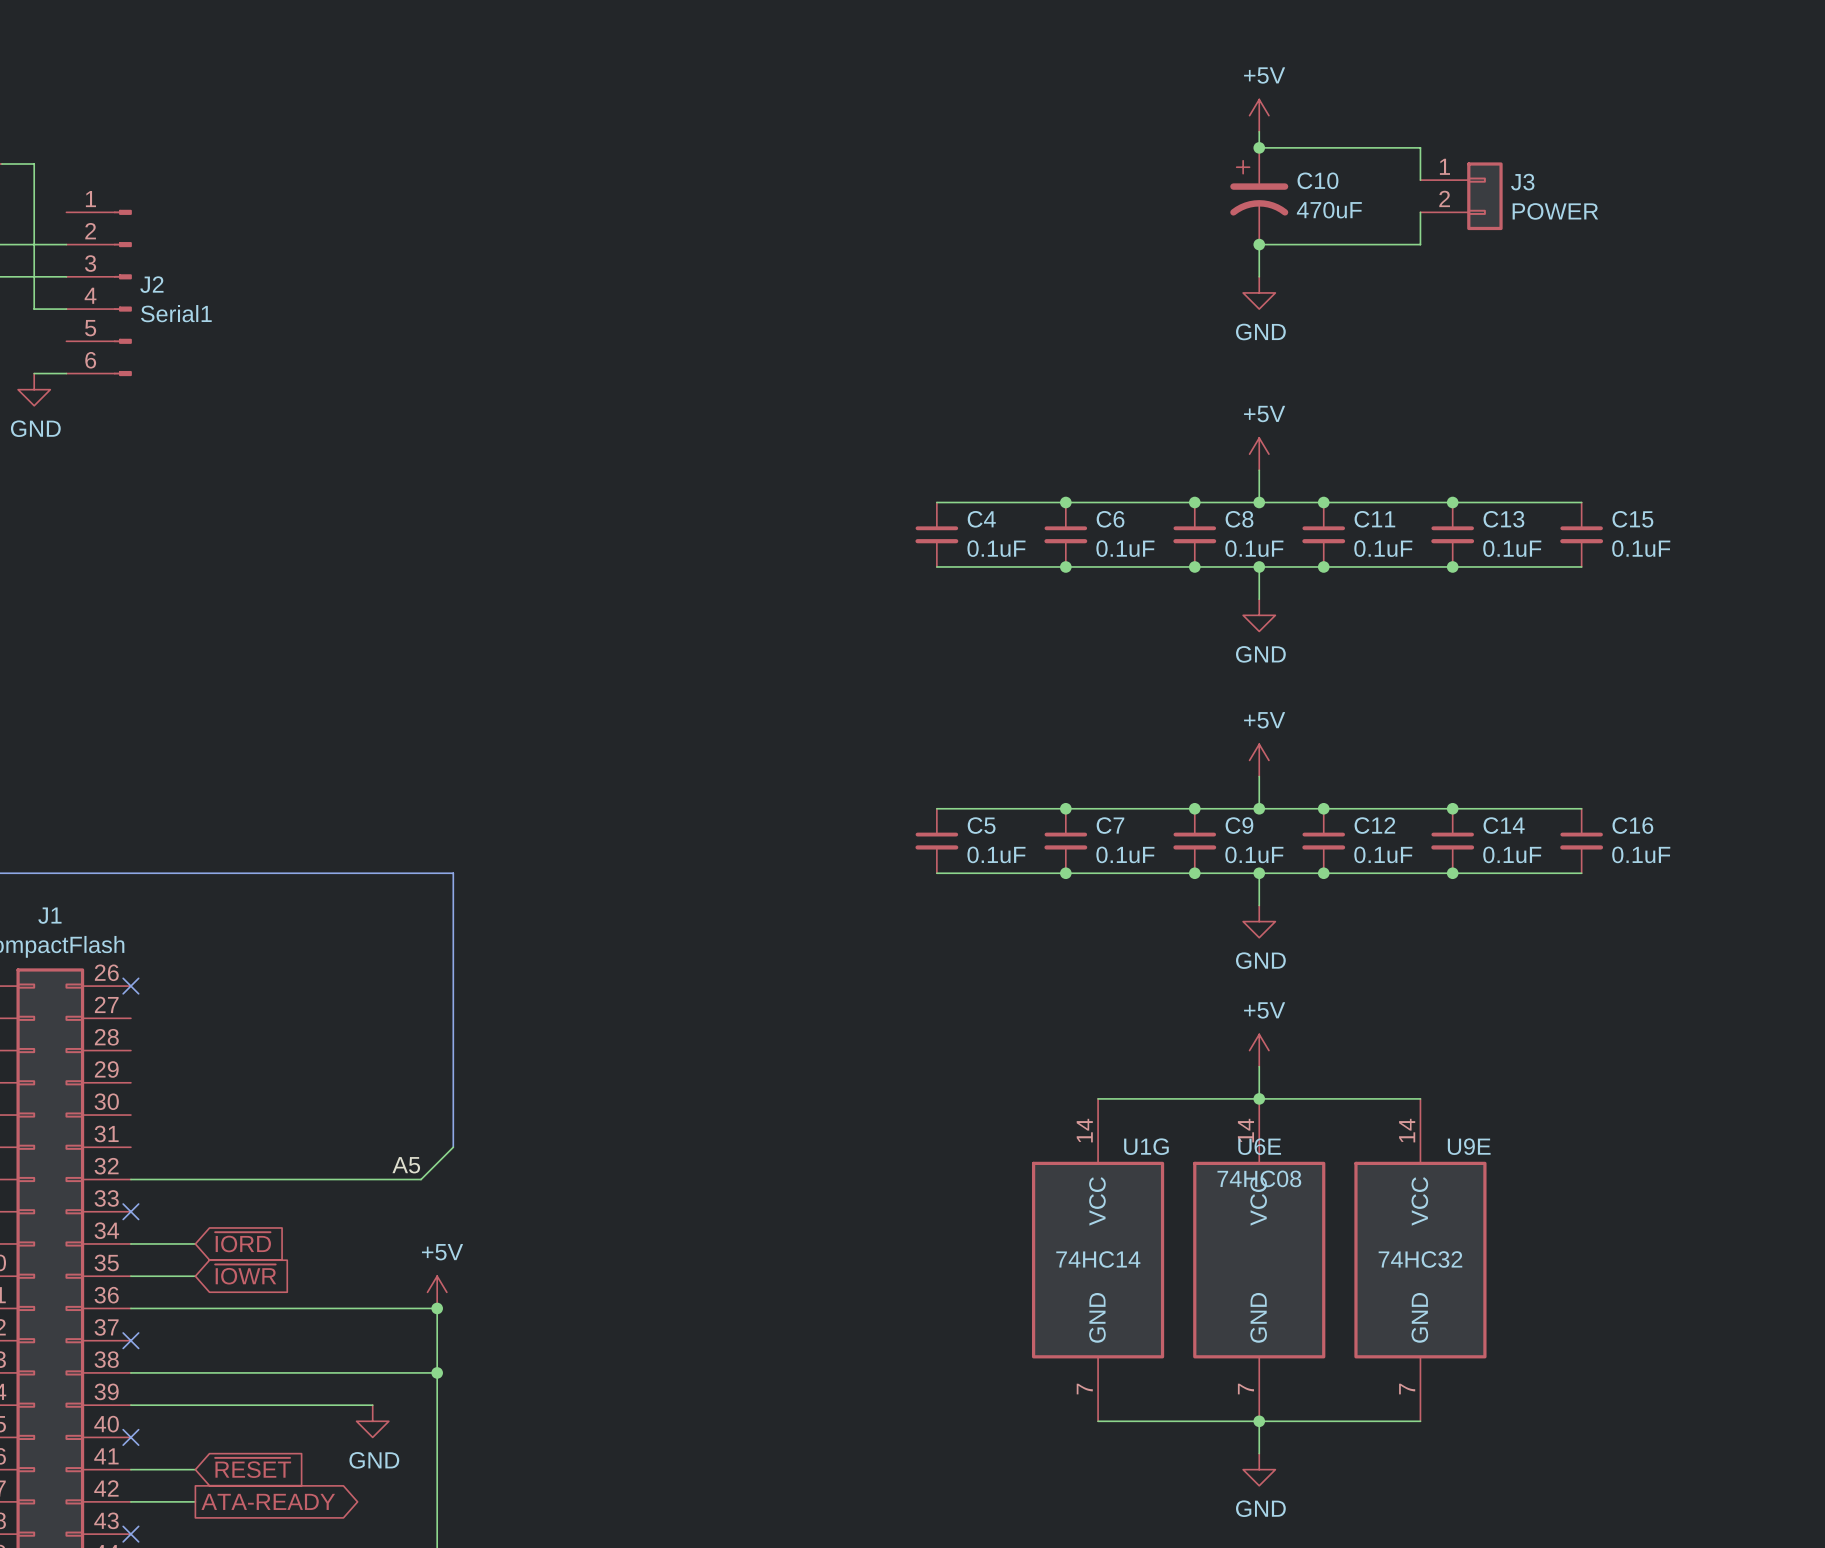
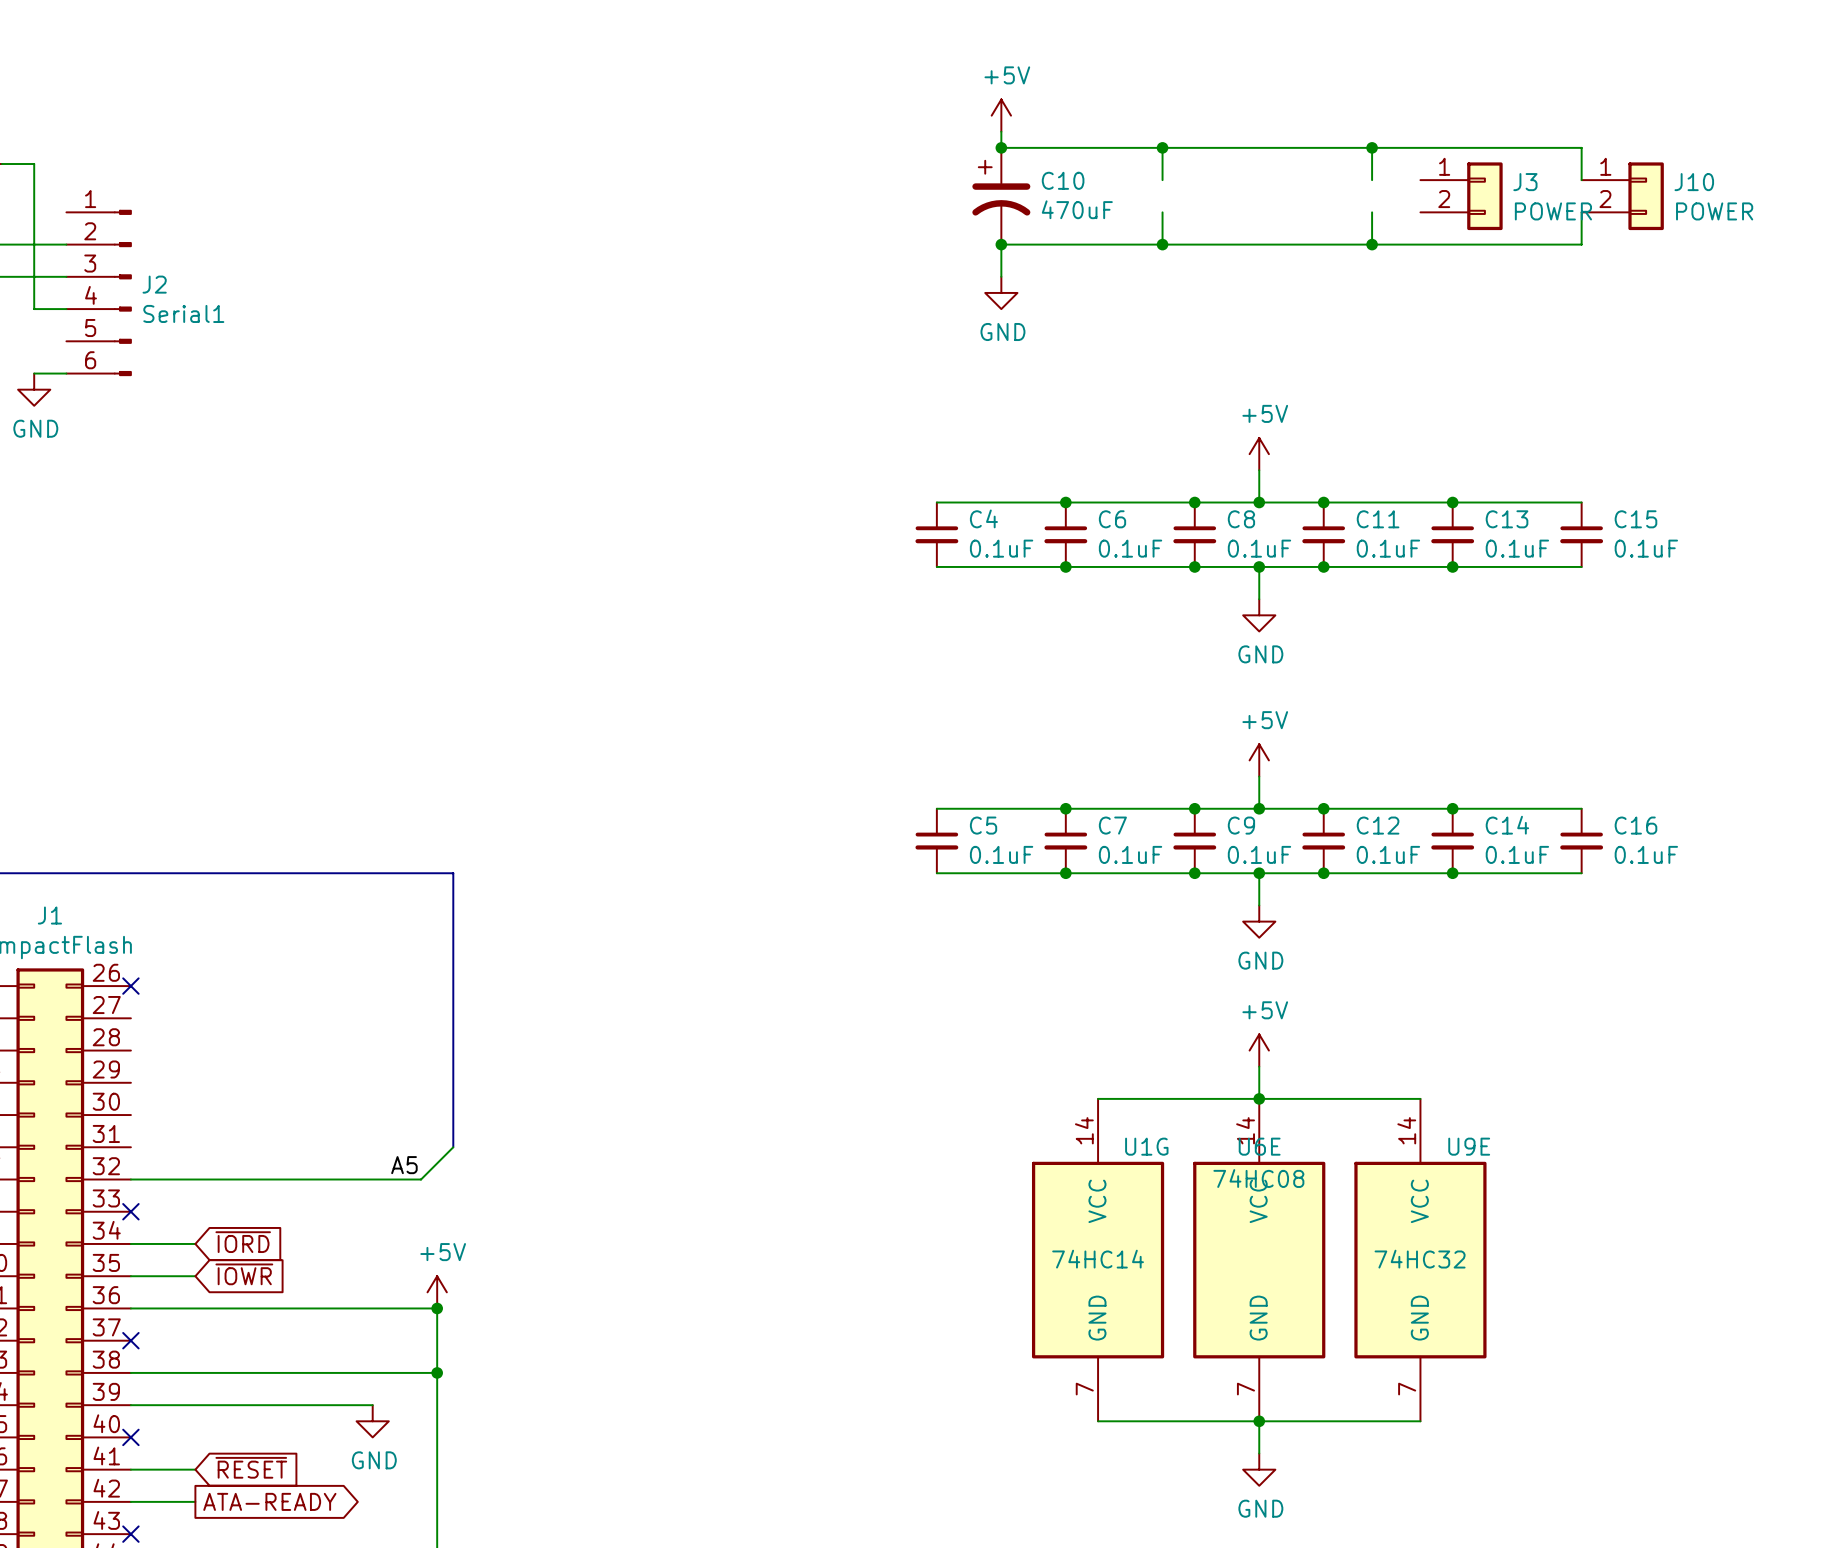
power symbol position: +5V (1259, 115) -> +5V (1001, 115)
wire: (1259, 131) (1259, 147) -> (1001, 131) (1001, 147) (1259, 147)
junction: none -> (1001, 147)
wire: none -> (1162, 147) (1162, 180)
junction: none -> (1162, 147)
junction: (1259, 147) -> none
wire: none -> (1372, 147) (1372, 180)
junction: none -> (1372, 147)
wire: (1420, 147) (1420, 180) -> (1420, 147) (1581, 147) (1581, 180)
C10 position: (1259, 196) -> (1001, 196)
J10: none -> POWER (1622, 196)
wire: none -> (1162, 212) (1162, 244)
wire: none -> (1372, 212) (1372, 244)
wire: (1420, 212) (1420, 244) -> (1581, 212) (1581, 244) (1420, 244)
junction: none -> (1001, 244)
junction: none -> (1162, 244)
wire: (1259, 244) (1259, 276) -> (1259, 244) (1001, 244) (1001, 276)
junction: (1259, 244) -> none
junction: none -> (1372, 244)
power symbol position: GND (1259, 292) -> GND (1001, 292)

